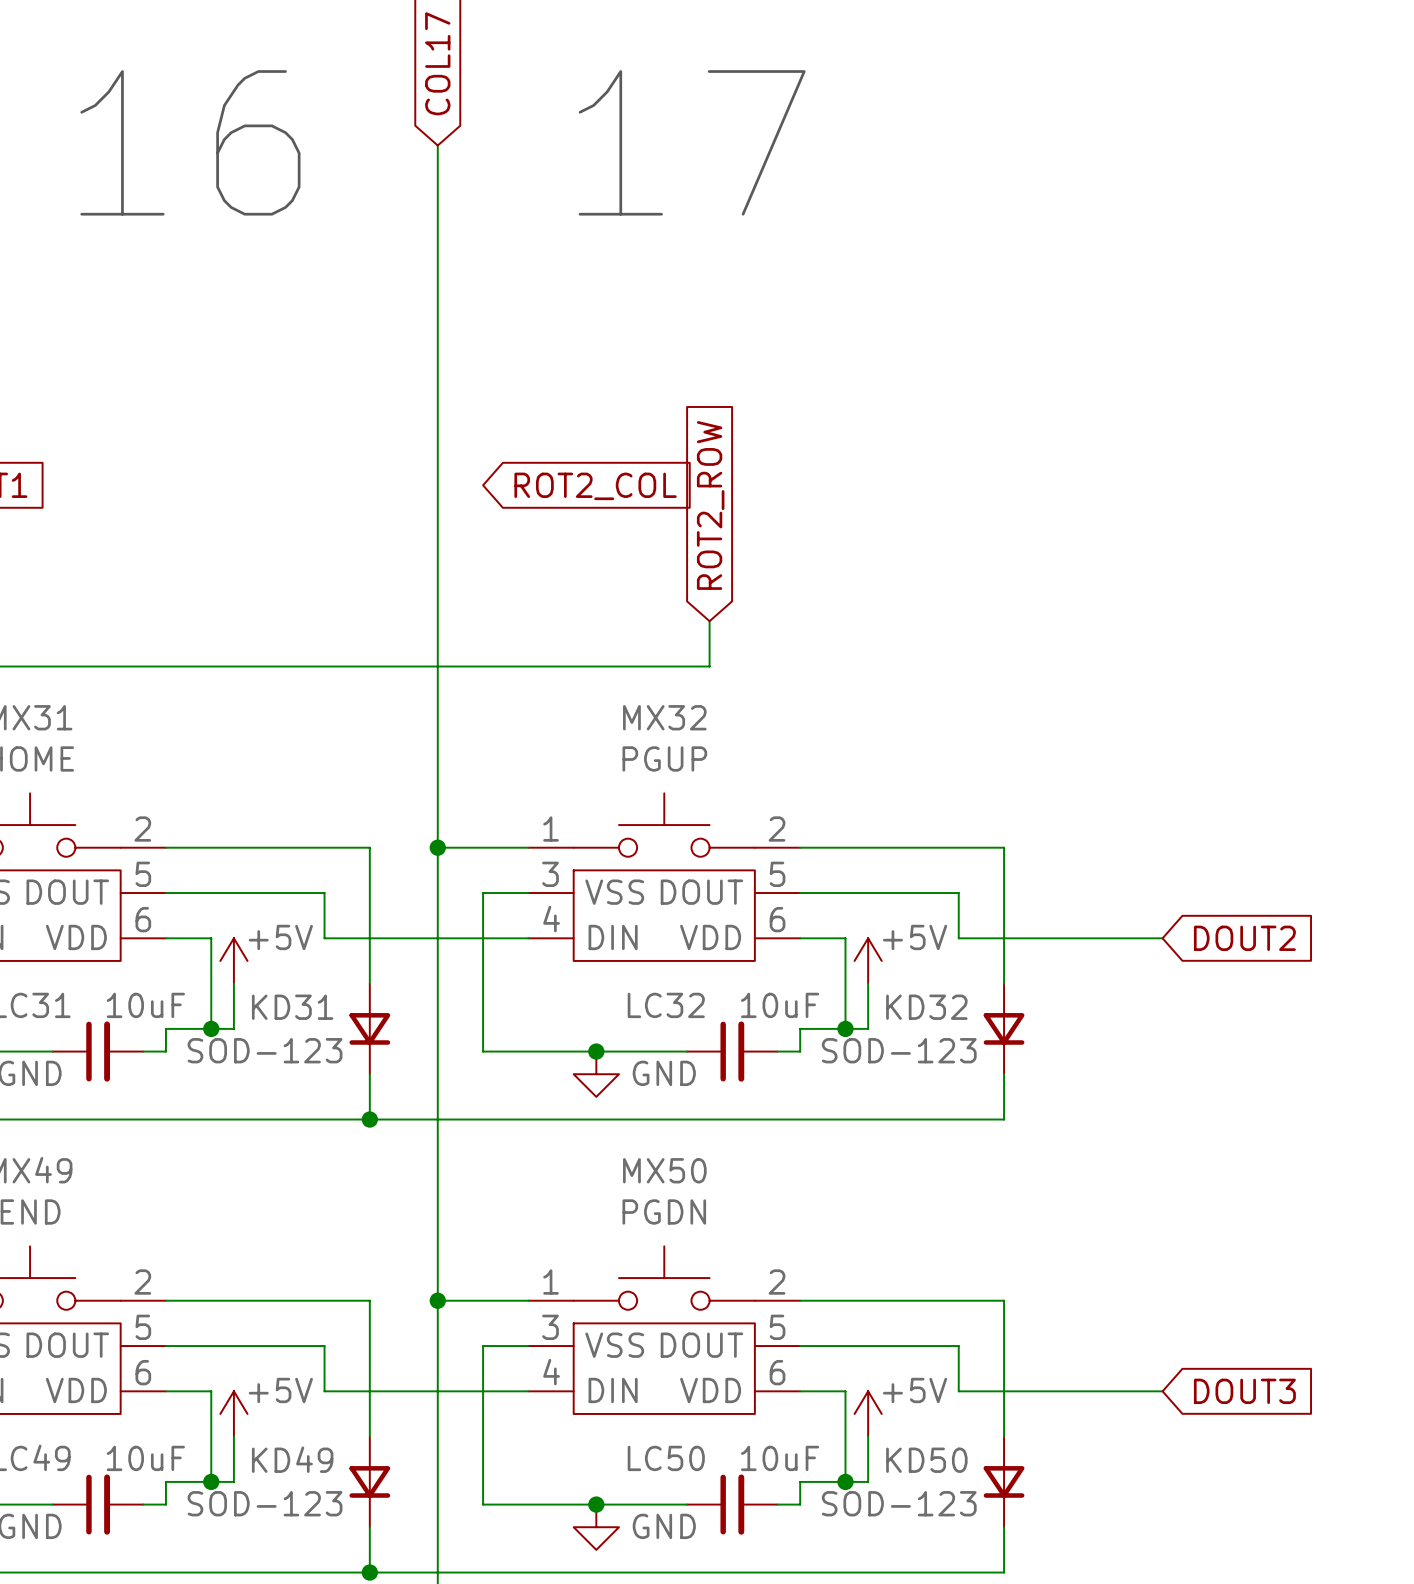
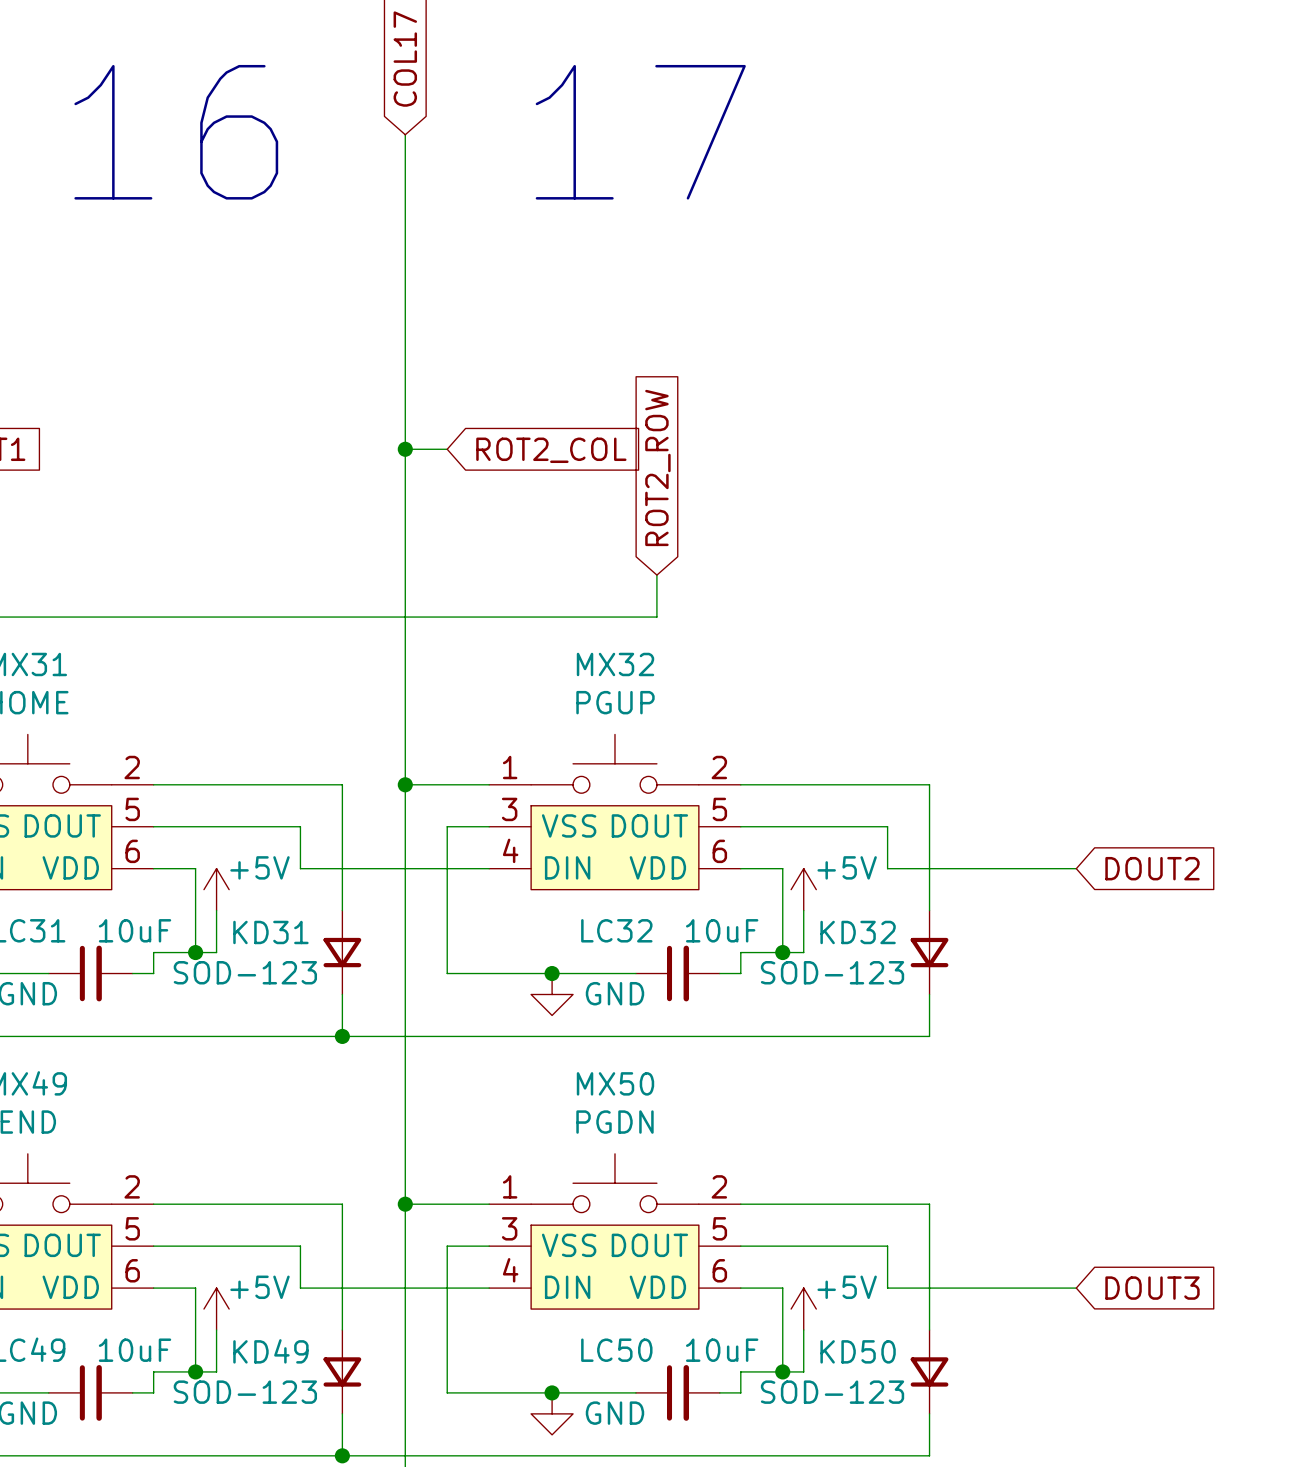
wire: none -> (405, 449) (447, 449)
junction: none -> (405, 449)

